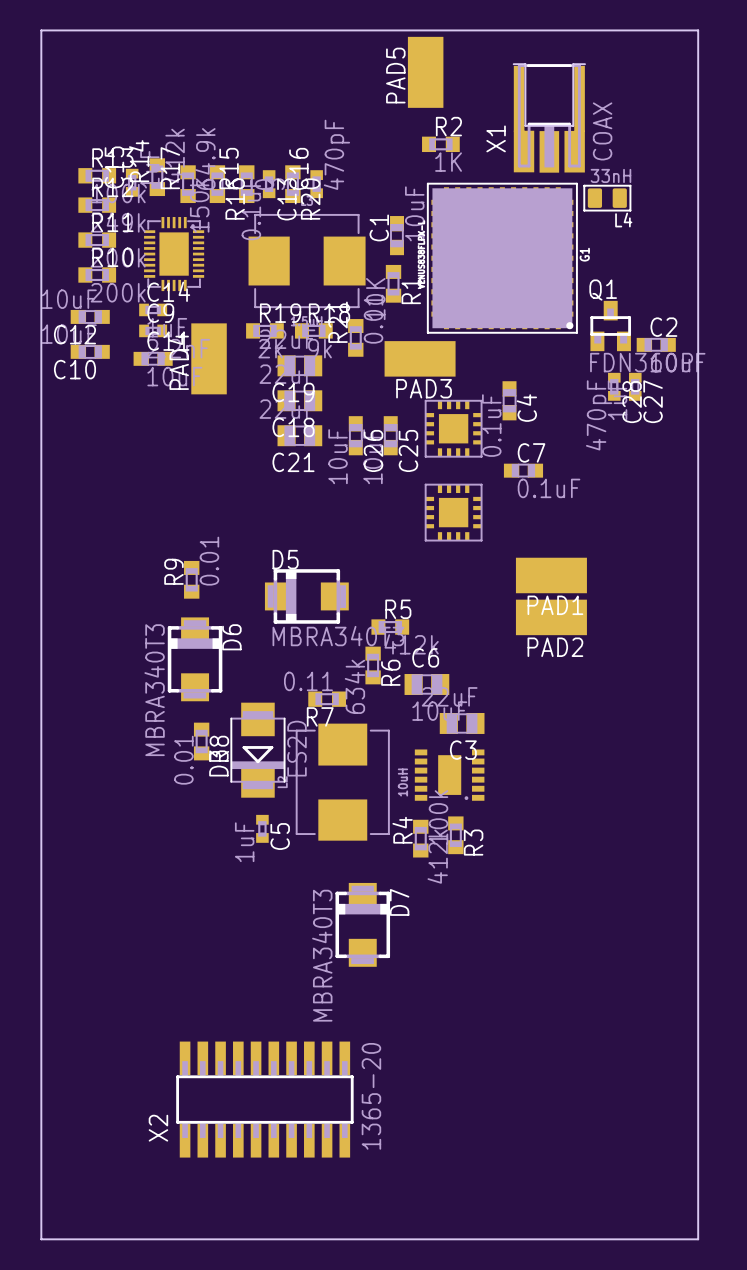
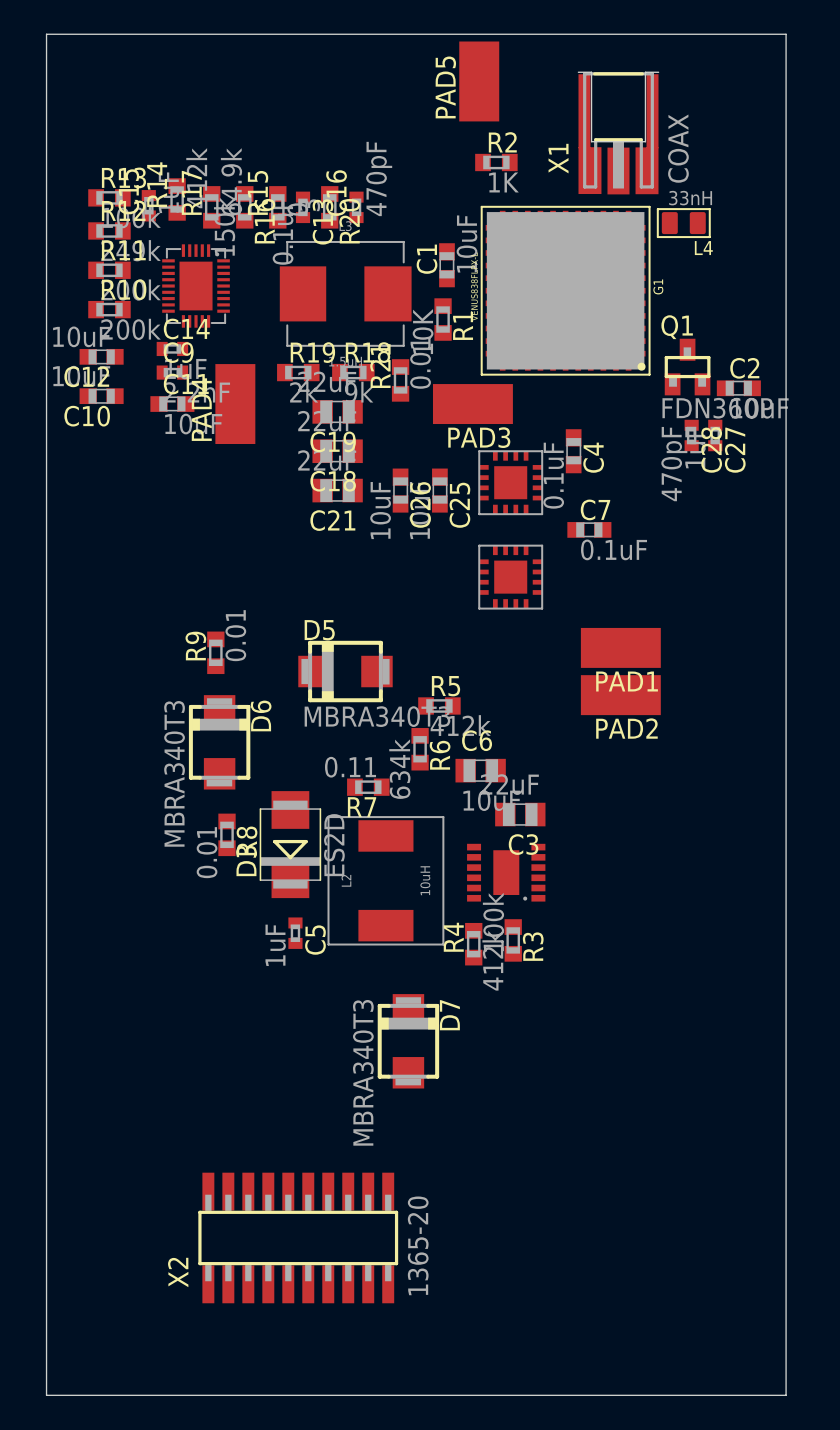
L2 footprint: [295, 723, 390, 841] -> [327, 816, 445, 946]

